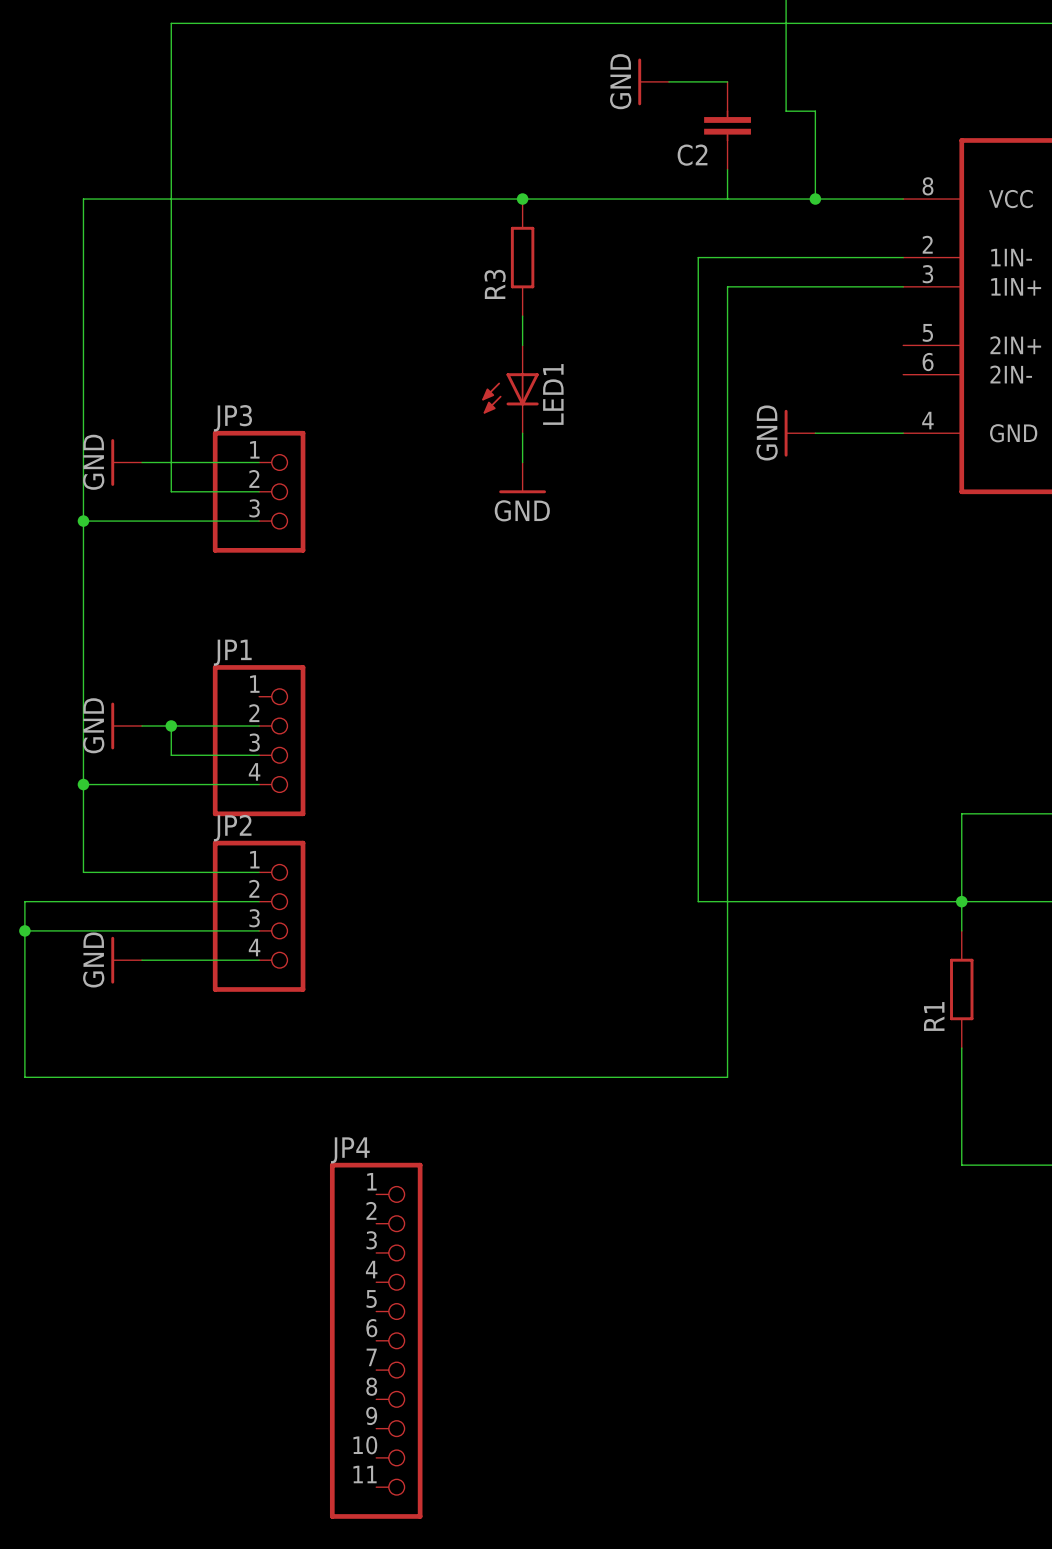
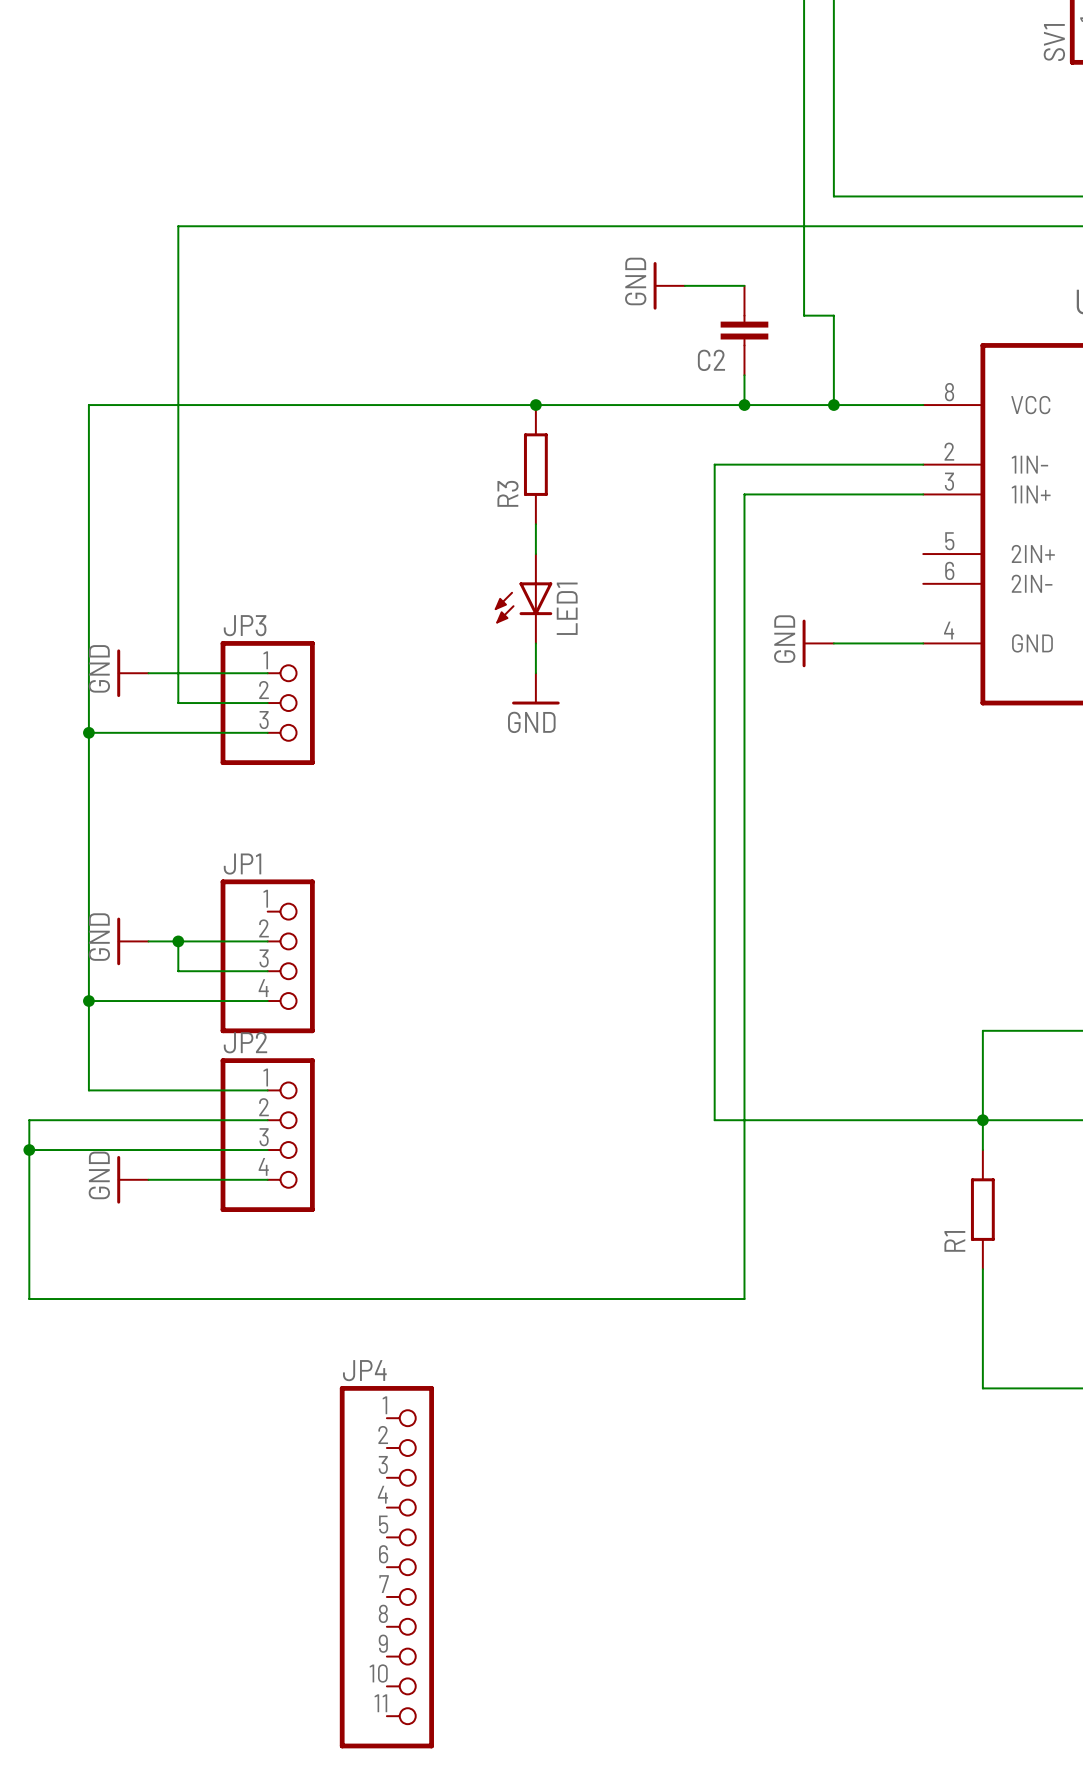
junction: none -> (744, 405)

